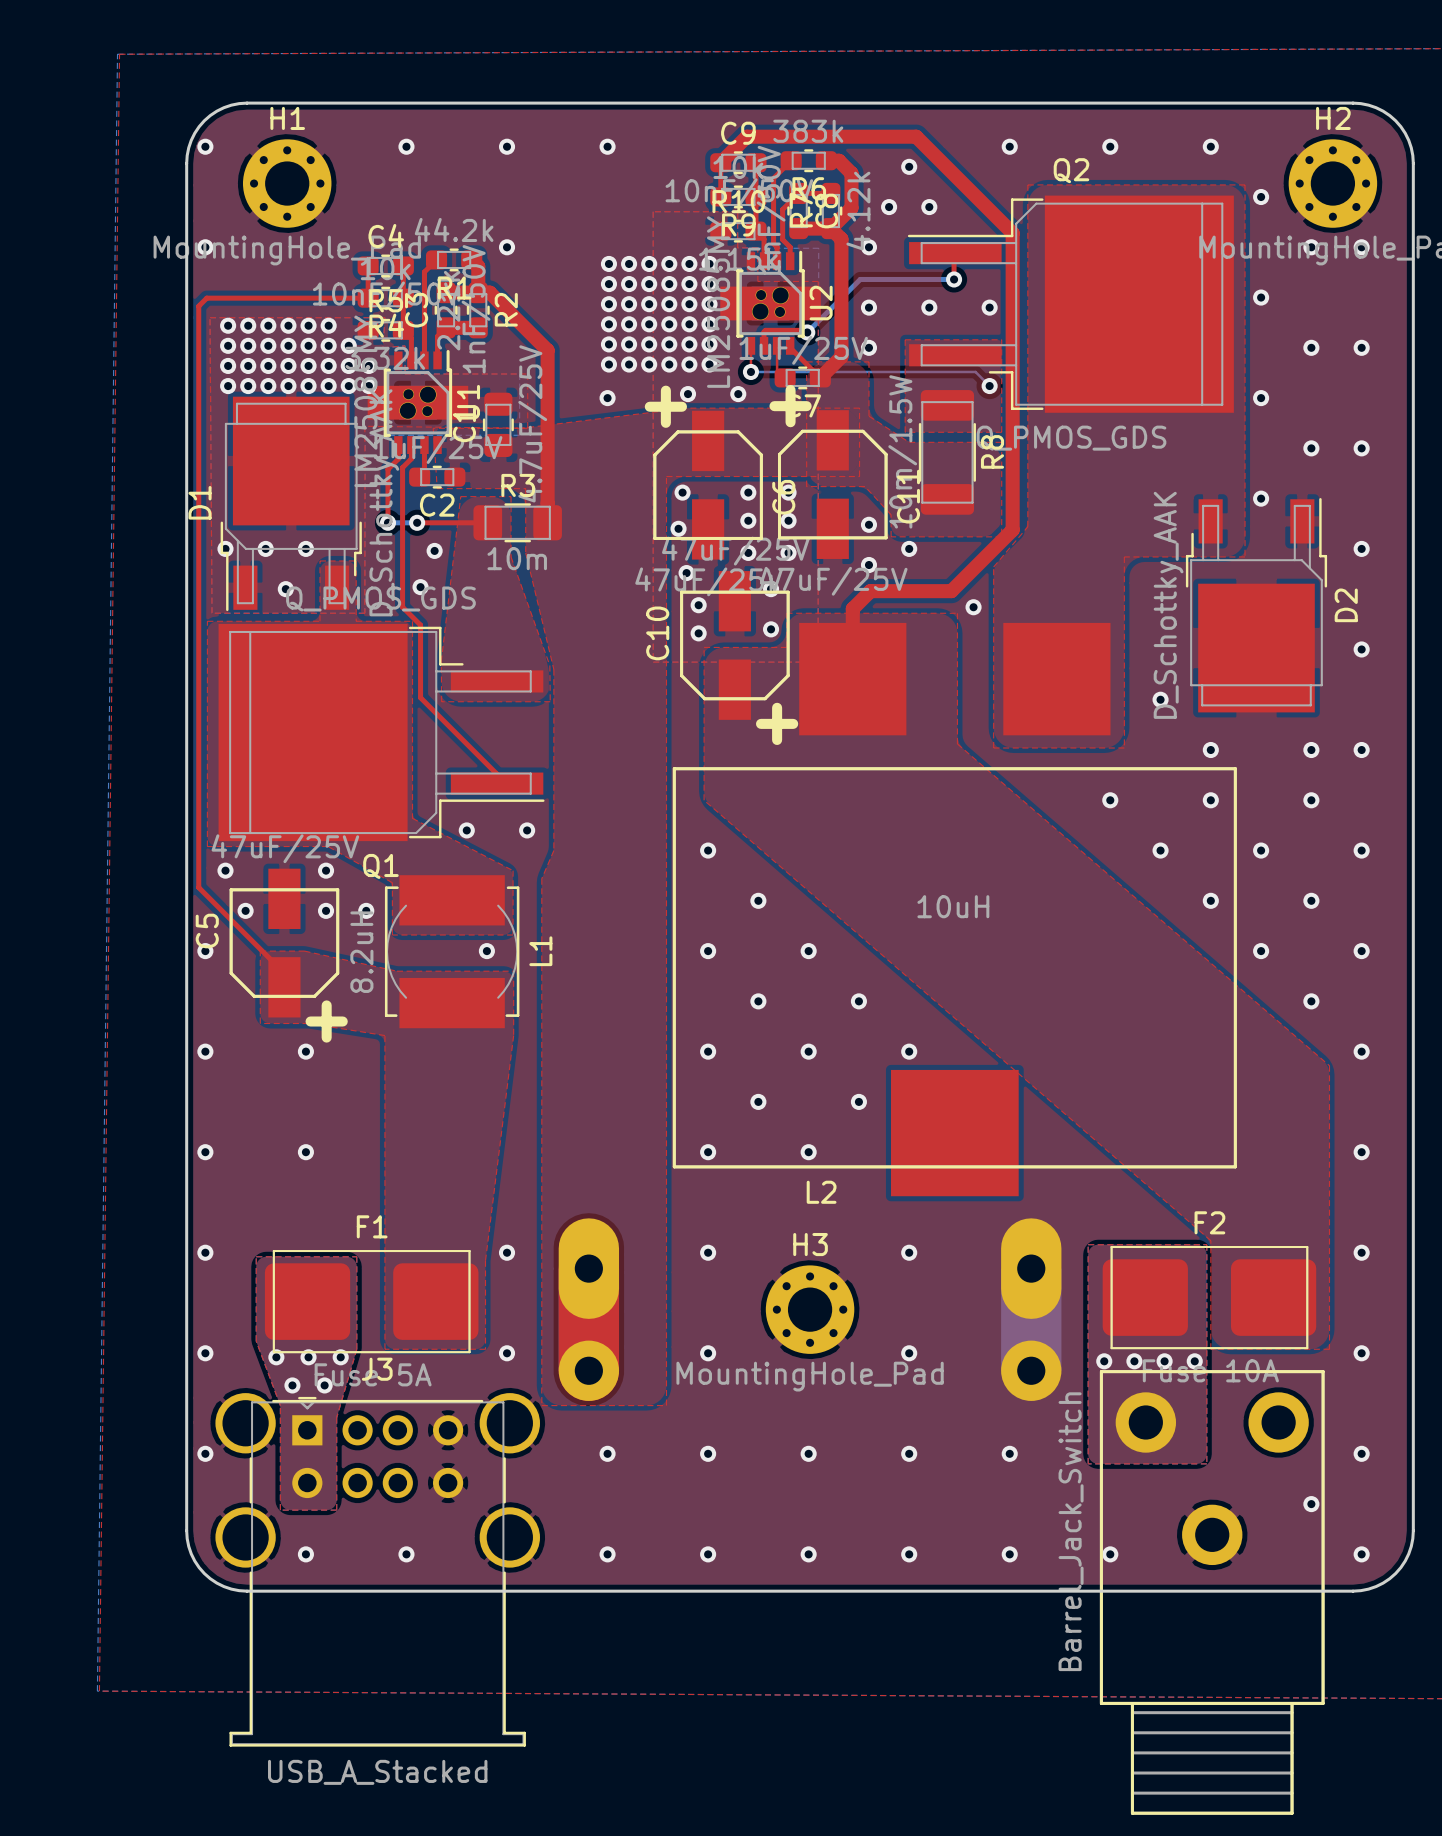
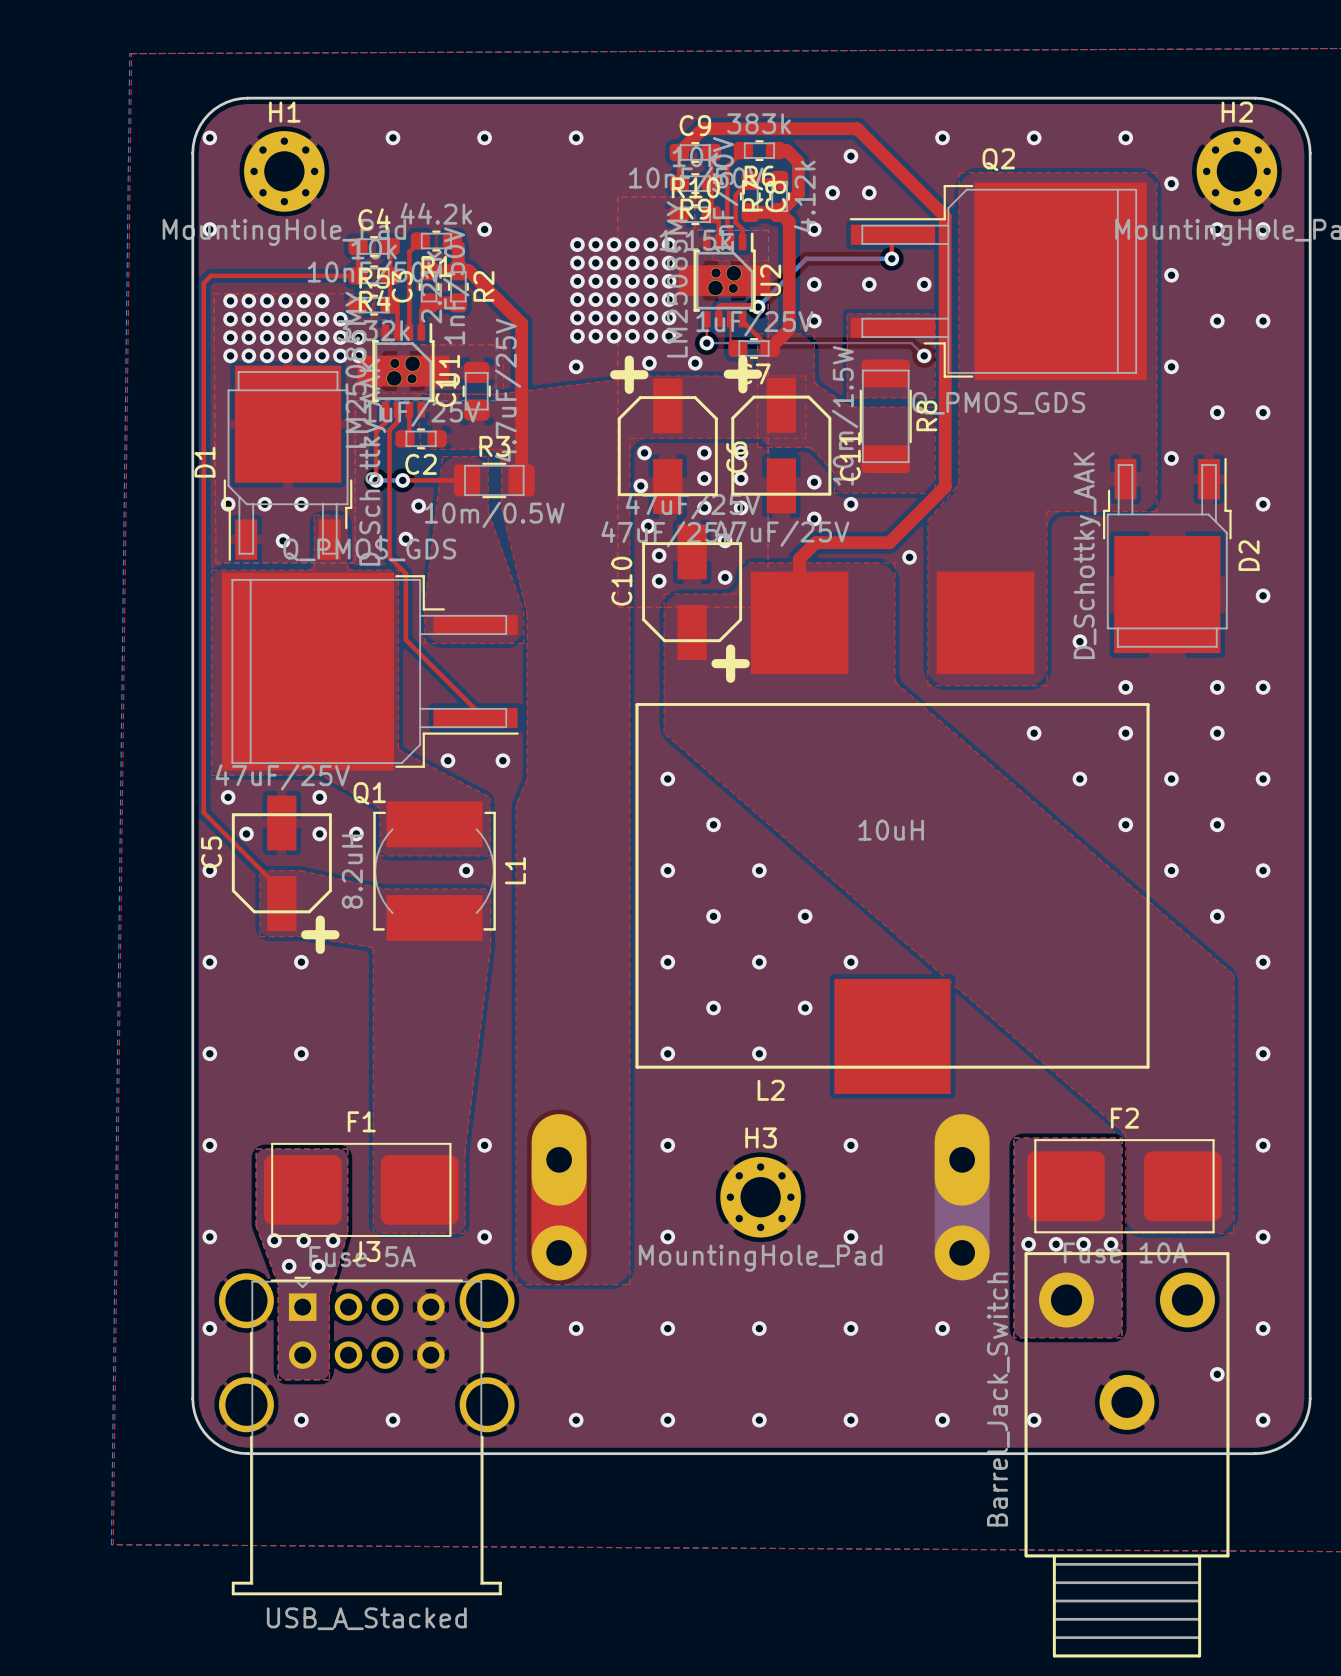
R3 value: 10m (517, 558) -> 10m/0.5W (494, 514)

